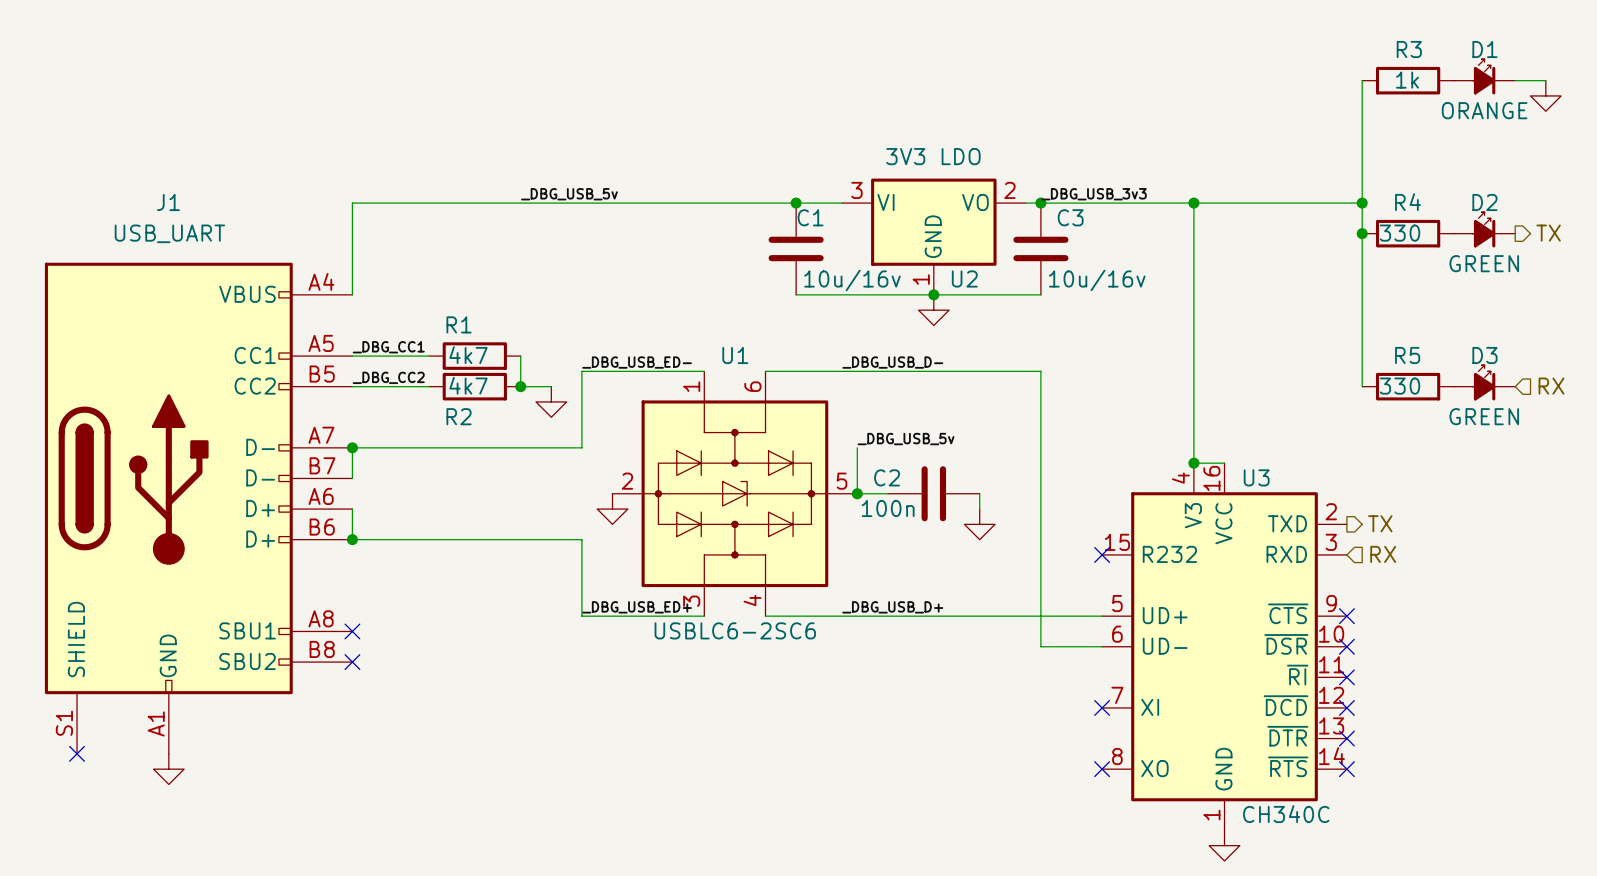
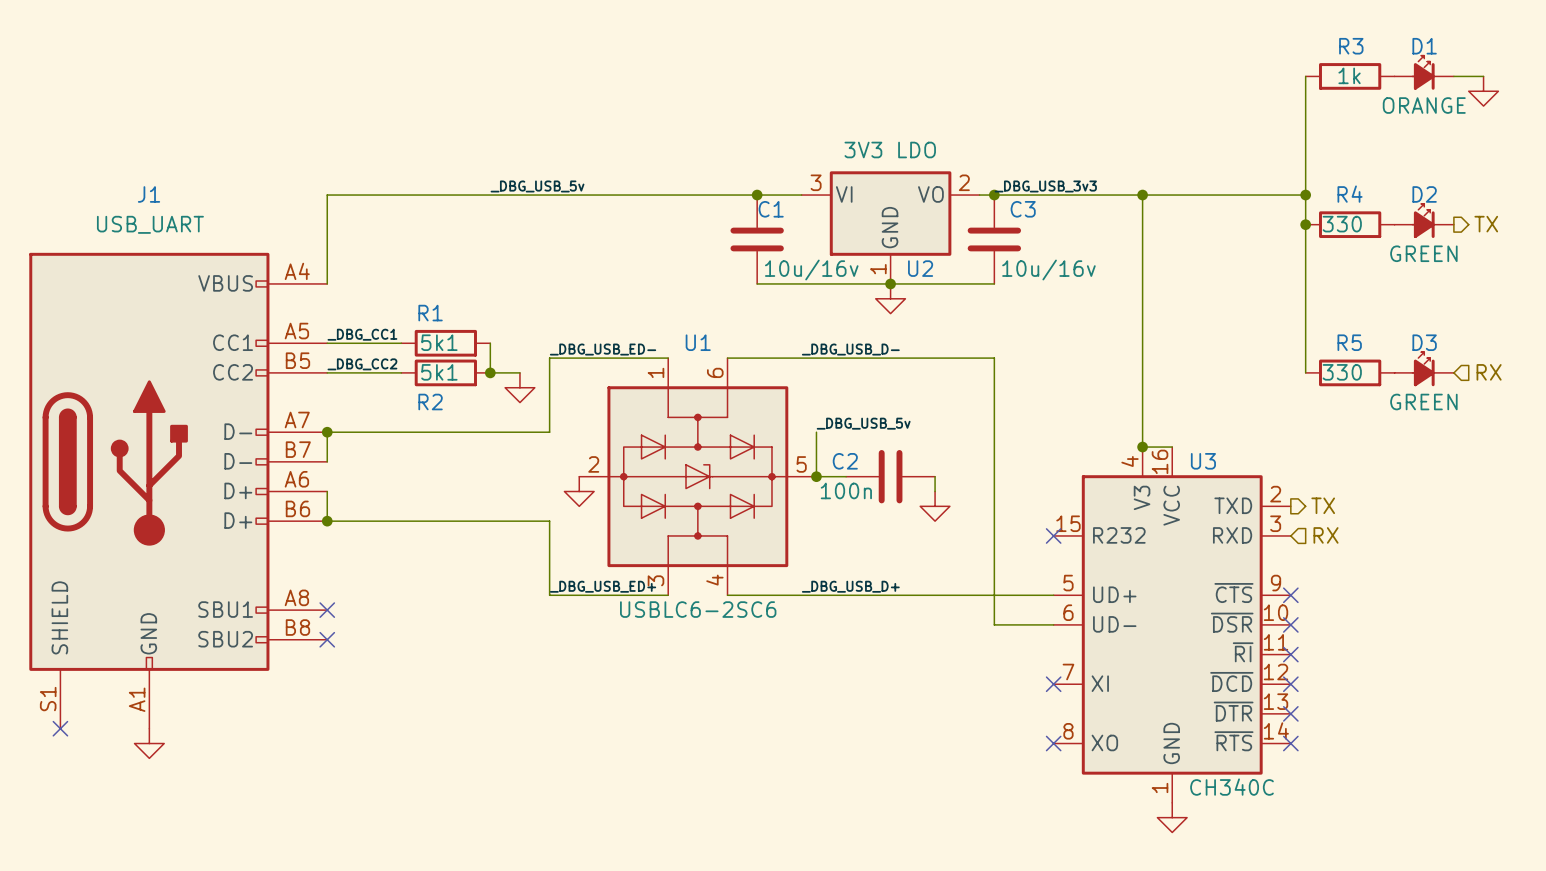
R1 value: 4k7 (468, 355) -> 5k1 (439, 342)
R2 value: 4k7 (468, 385) -> 5k1 (439, 372)

